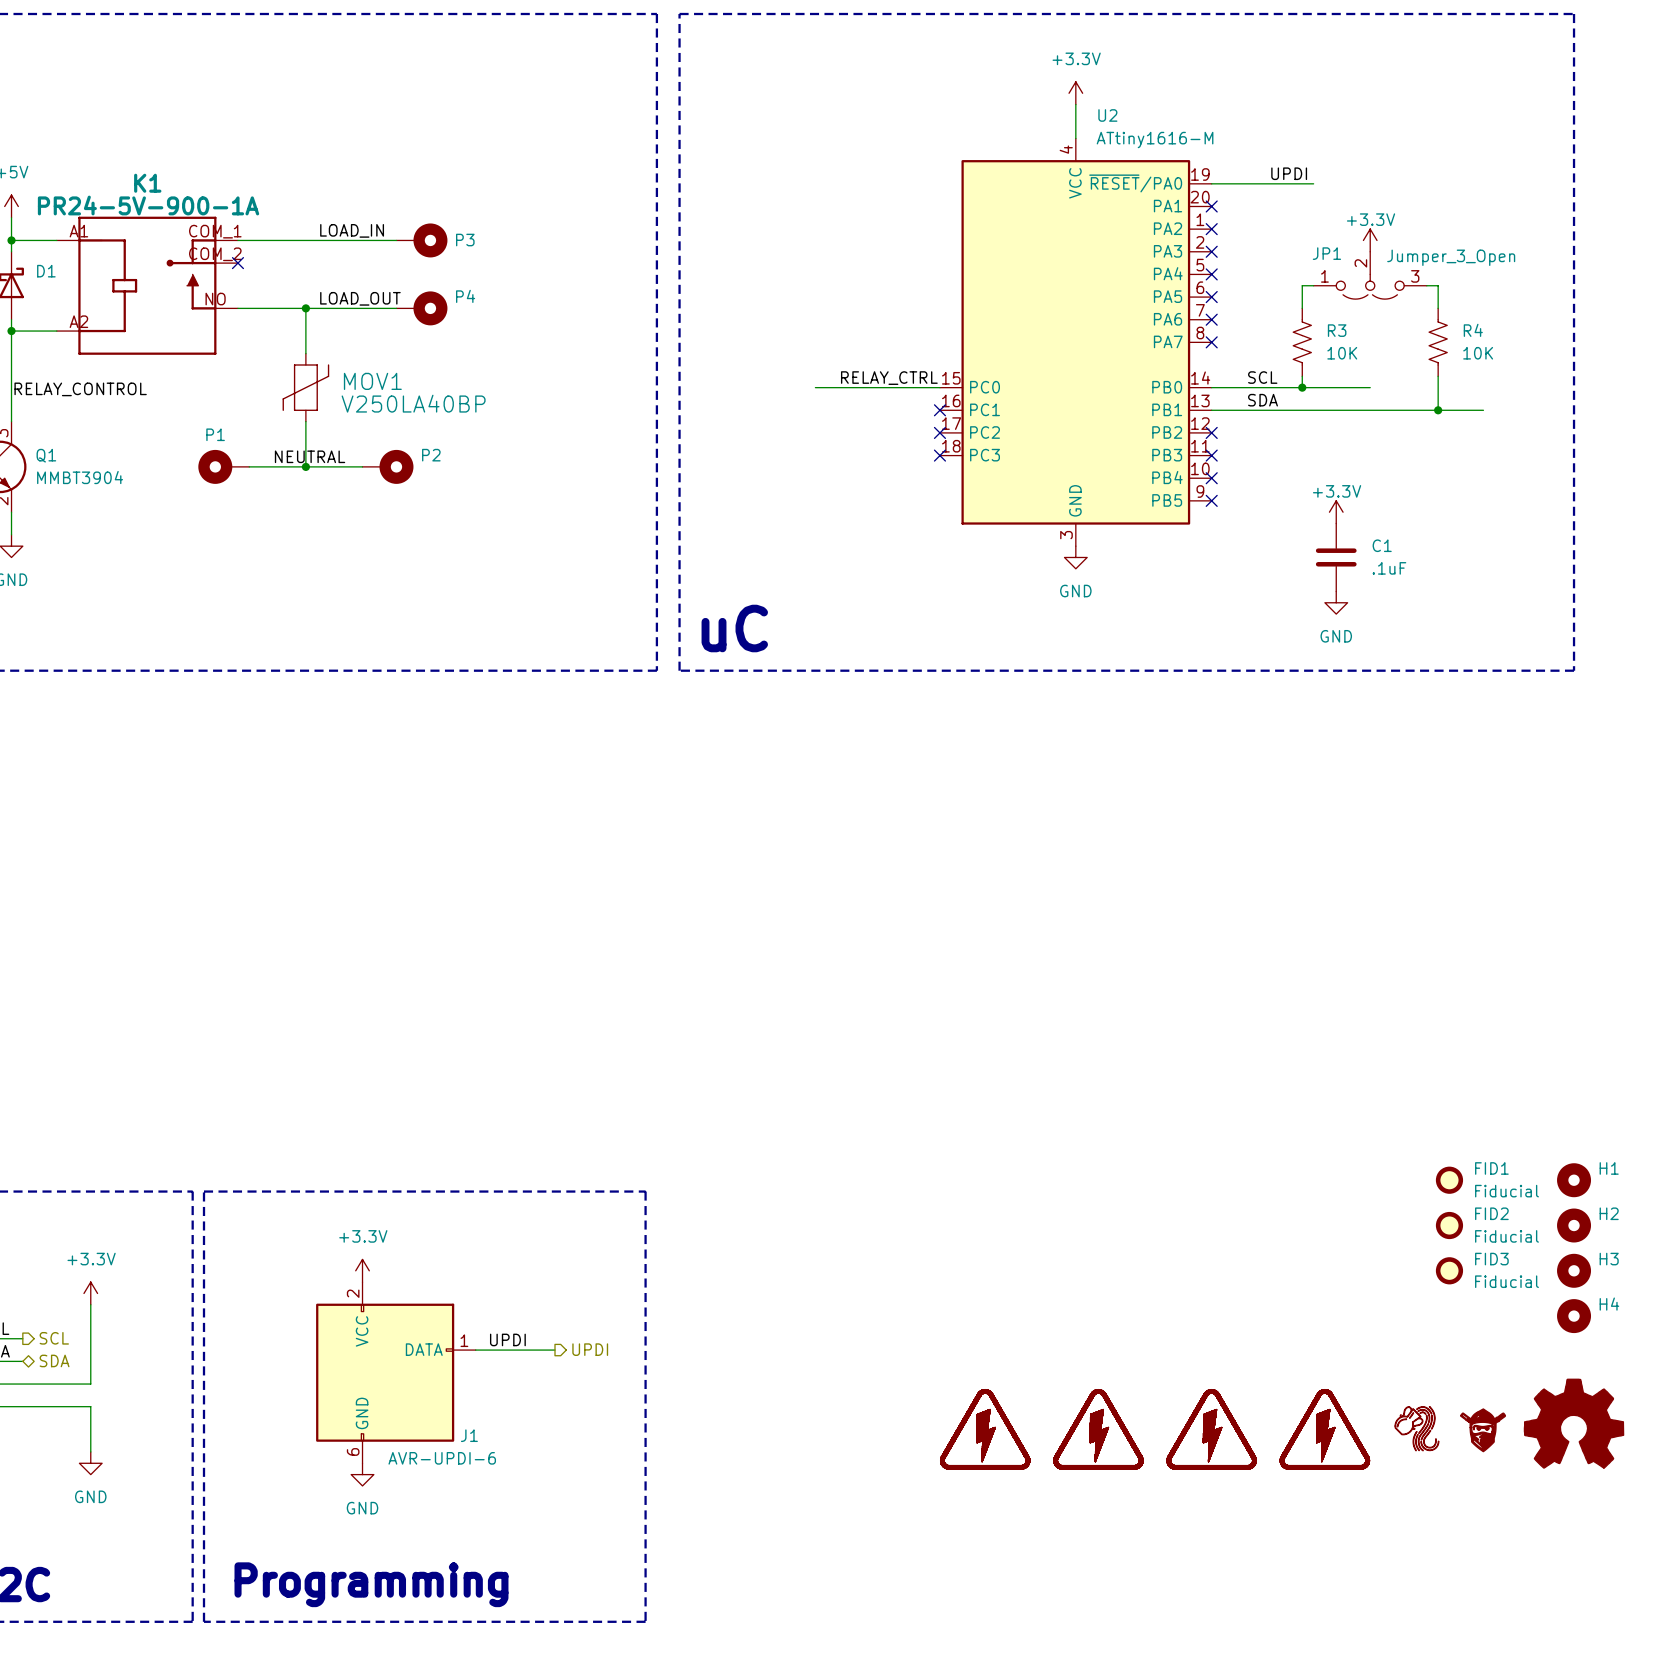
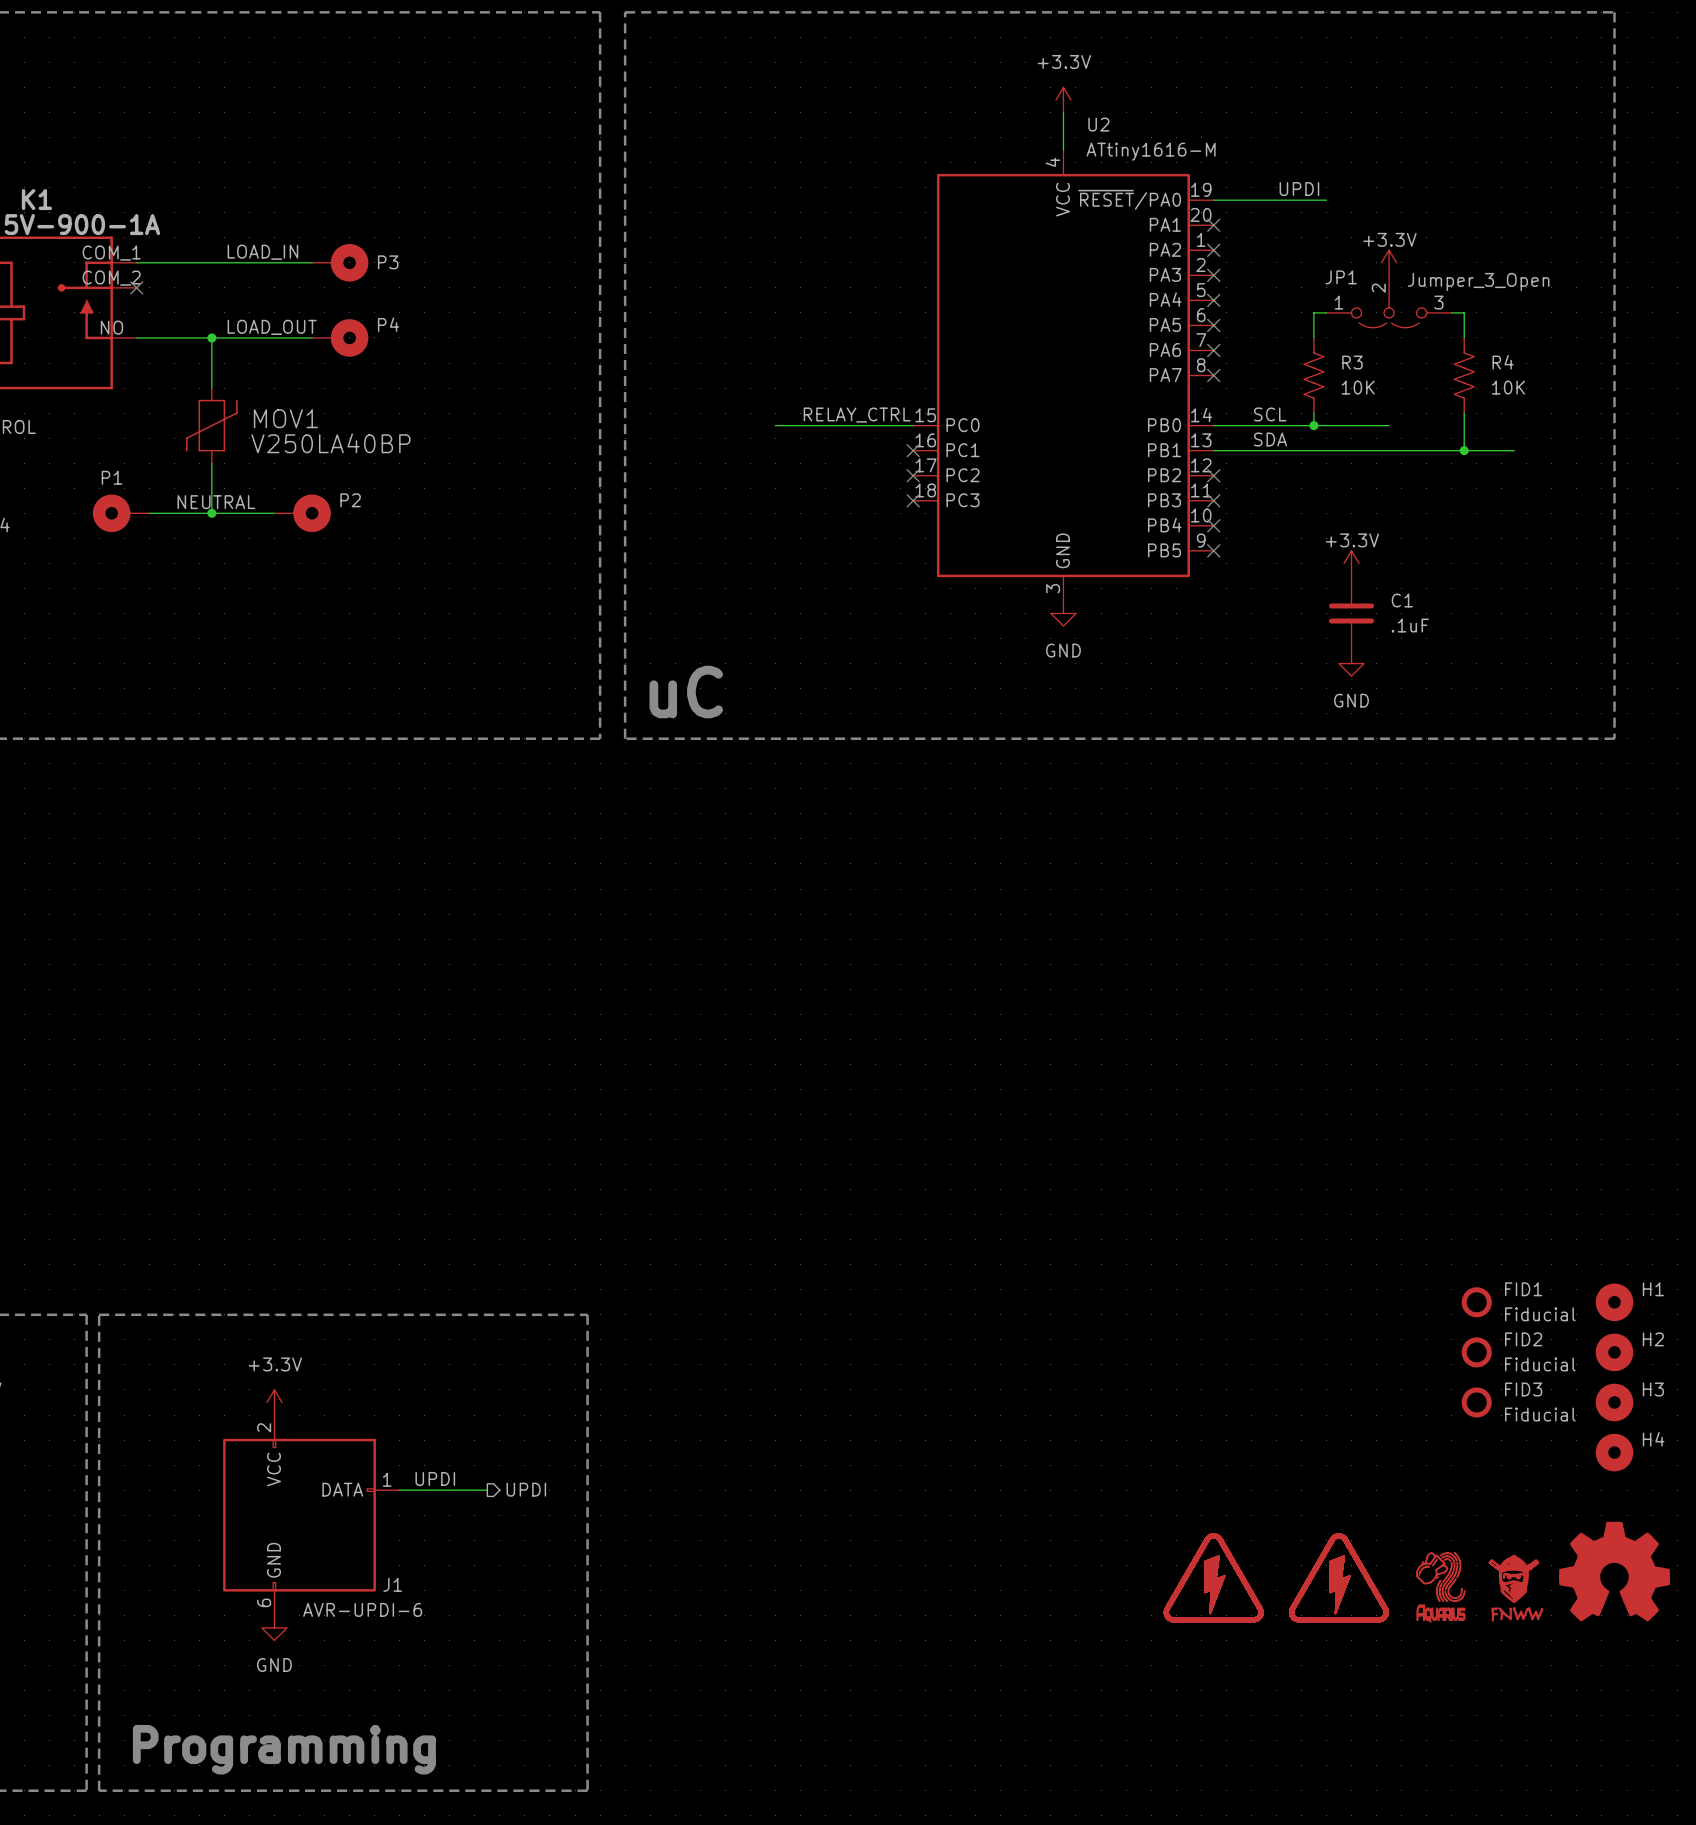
part: (985, 1429) -> none
part: (1098, 1429) -> none
part: none -> (1440, 1613)
part: none -> (1517, 1614)

